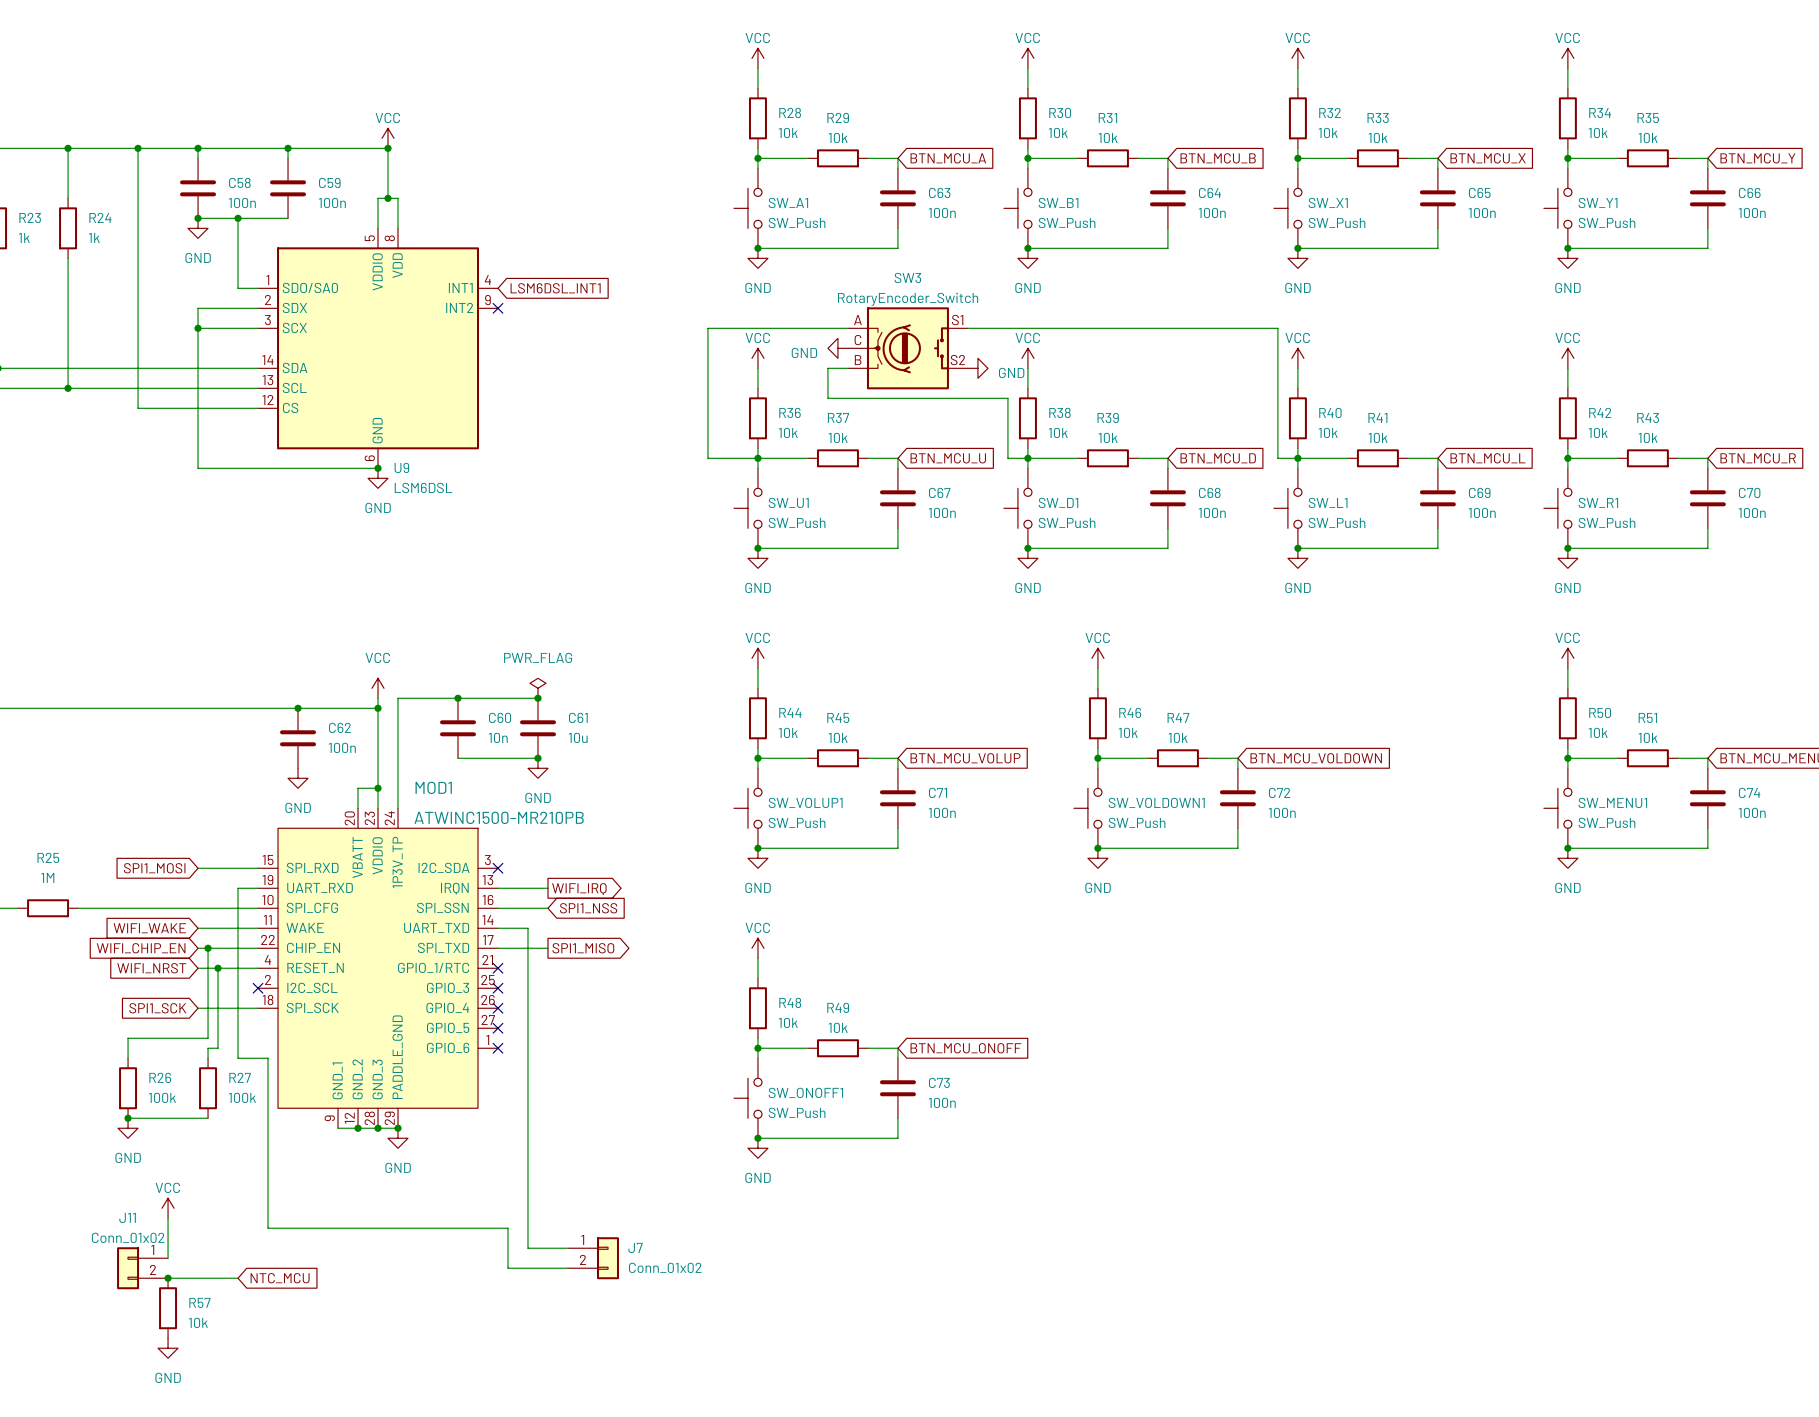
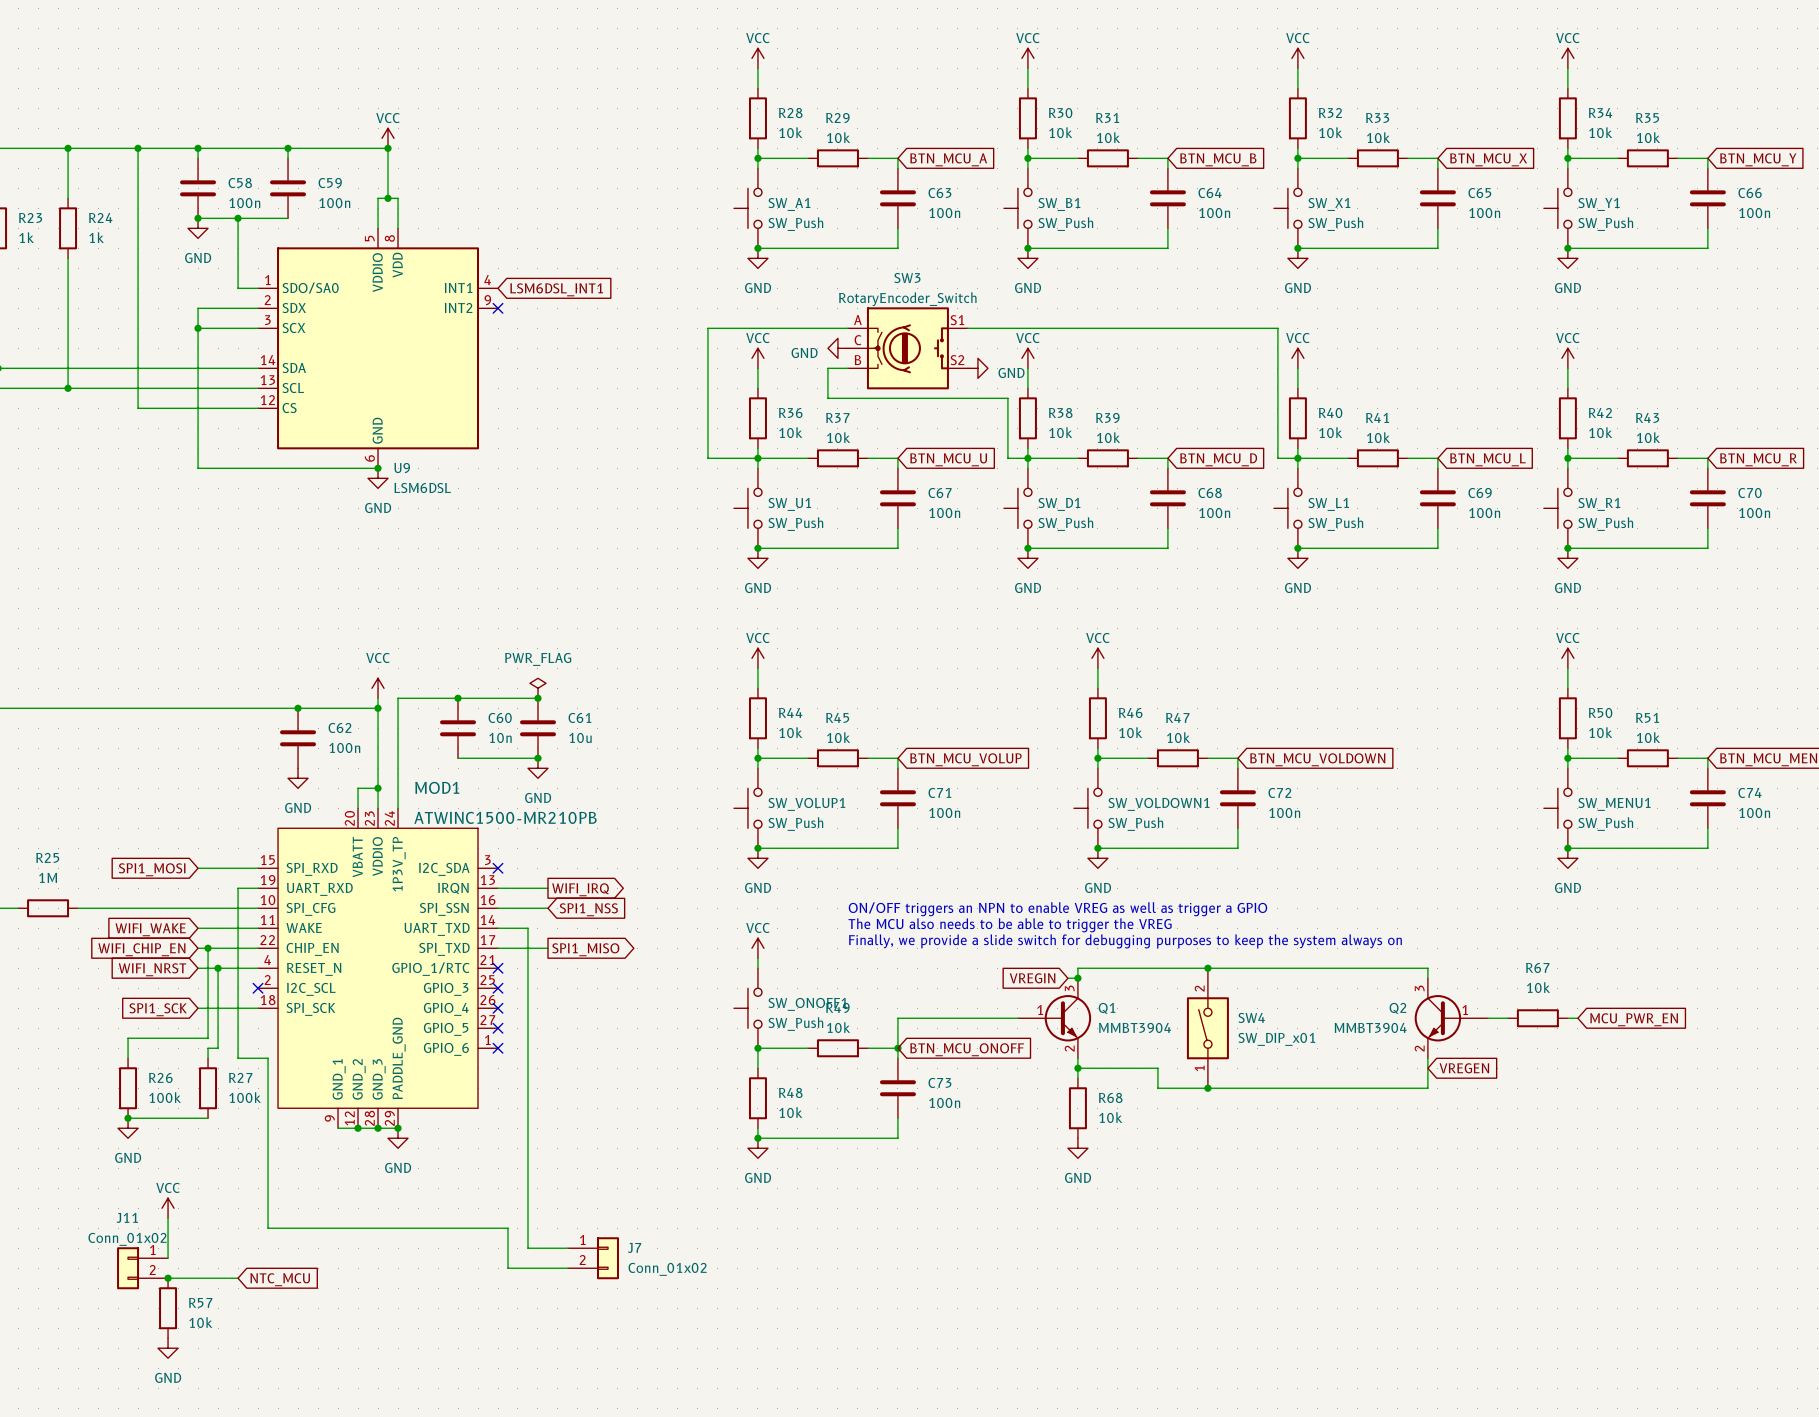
text: none -> ON/OFF triggers an NPN to enable VREG as well as trigger a GPIO (1057, 909)
text: none -> The MCU also needs to be able to trigger the VREG (1010, 925)
text: none -> Finally, we provide a slide switch for debugging purposes to keep the system always on (1125, 941)
junction: none -> (1207, 968)
global label: none -> VREGIN (1032, 978)
wire: none -> (1067, 978) (1077, 978) (1077, 968) (1427, 968) (1427, 978)
junction: none -> (1077, 978)
R48 position: (757, 1008) -> (757, 1098)
wire: none -> (1017, 1018) (897, 1018) (897, 1048)
Q1: none -> MMBT3904 (1054, 1018)
Q2: none -> MMBT3904 (1451, 1018)
wire: none -> (1487, 1018) (1507, 1018)
R67: none -> 10k (1537, 1018)
wire: none -> (1567, 1018) (1577, 1018)
global label: none -> MCU_PWR_EN (1634, 1019)
SW4: none -> SW_DIP_x01 (1207, 1028)
junction: none -> (897, 1048)
wire: none -> (1077, 1058) (1077, 1078)
wire: none -> (1427, 1058) (1427, 1088) (1157, 1088) (1157, 1068) (1077, 1068)
junction: none -> (1077, 1068)
global label: none -> VREGEN (1464, 1068)
junction: none -> (1207, 1088)
SW_ONOFF1 position: (747, 1098) -> (747, 1008)
R68: none -> 10k (1077, 1108)
power symbol: none -> GND (1077, 1148)

